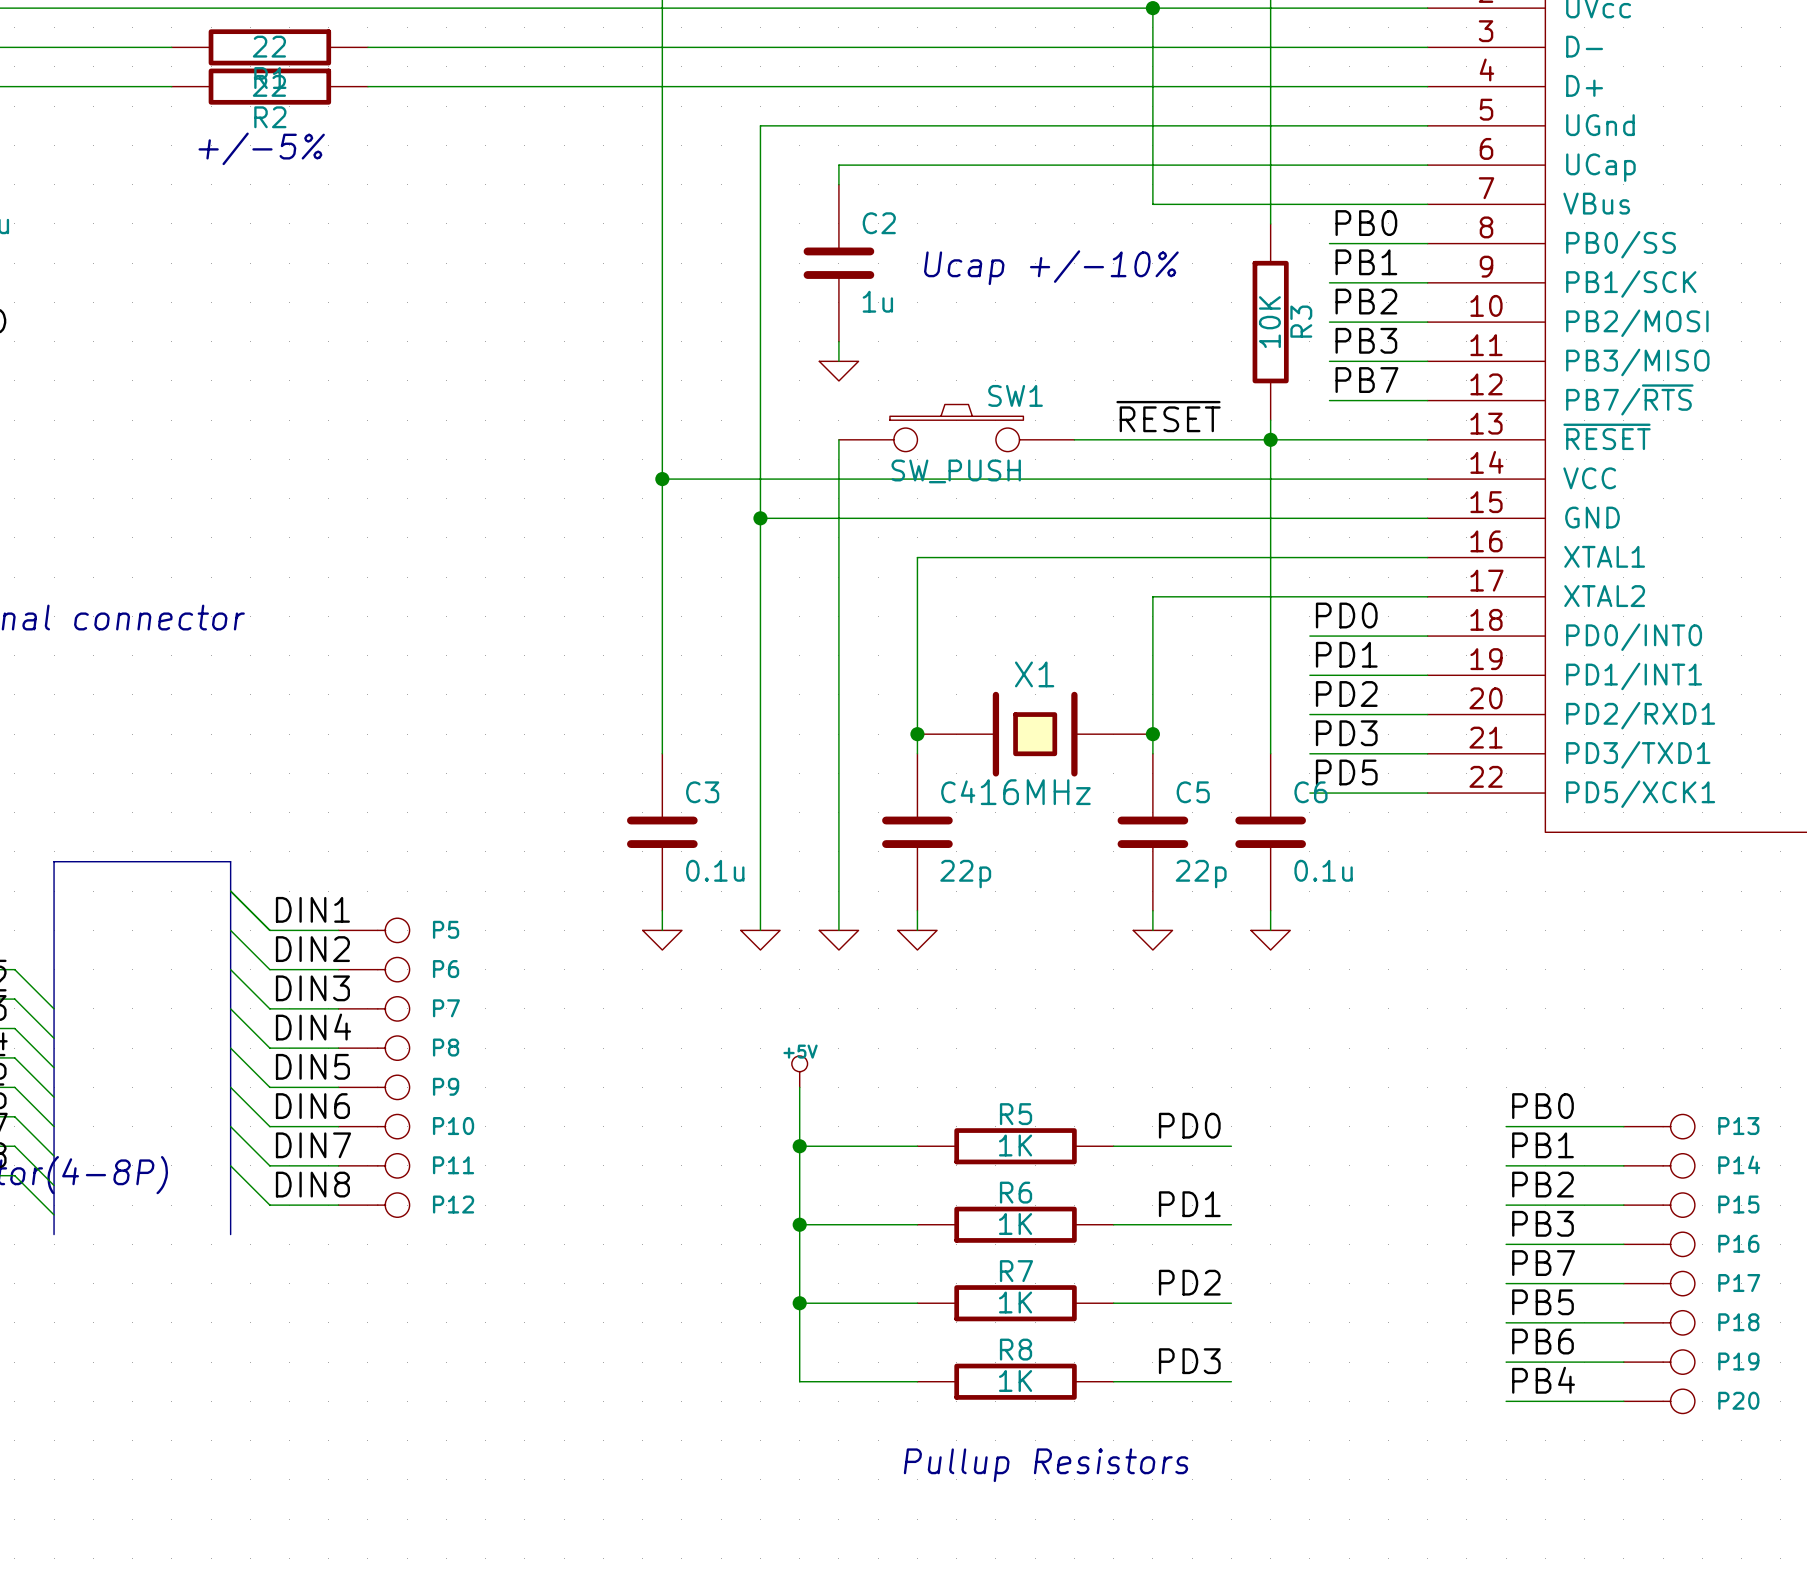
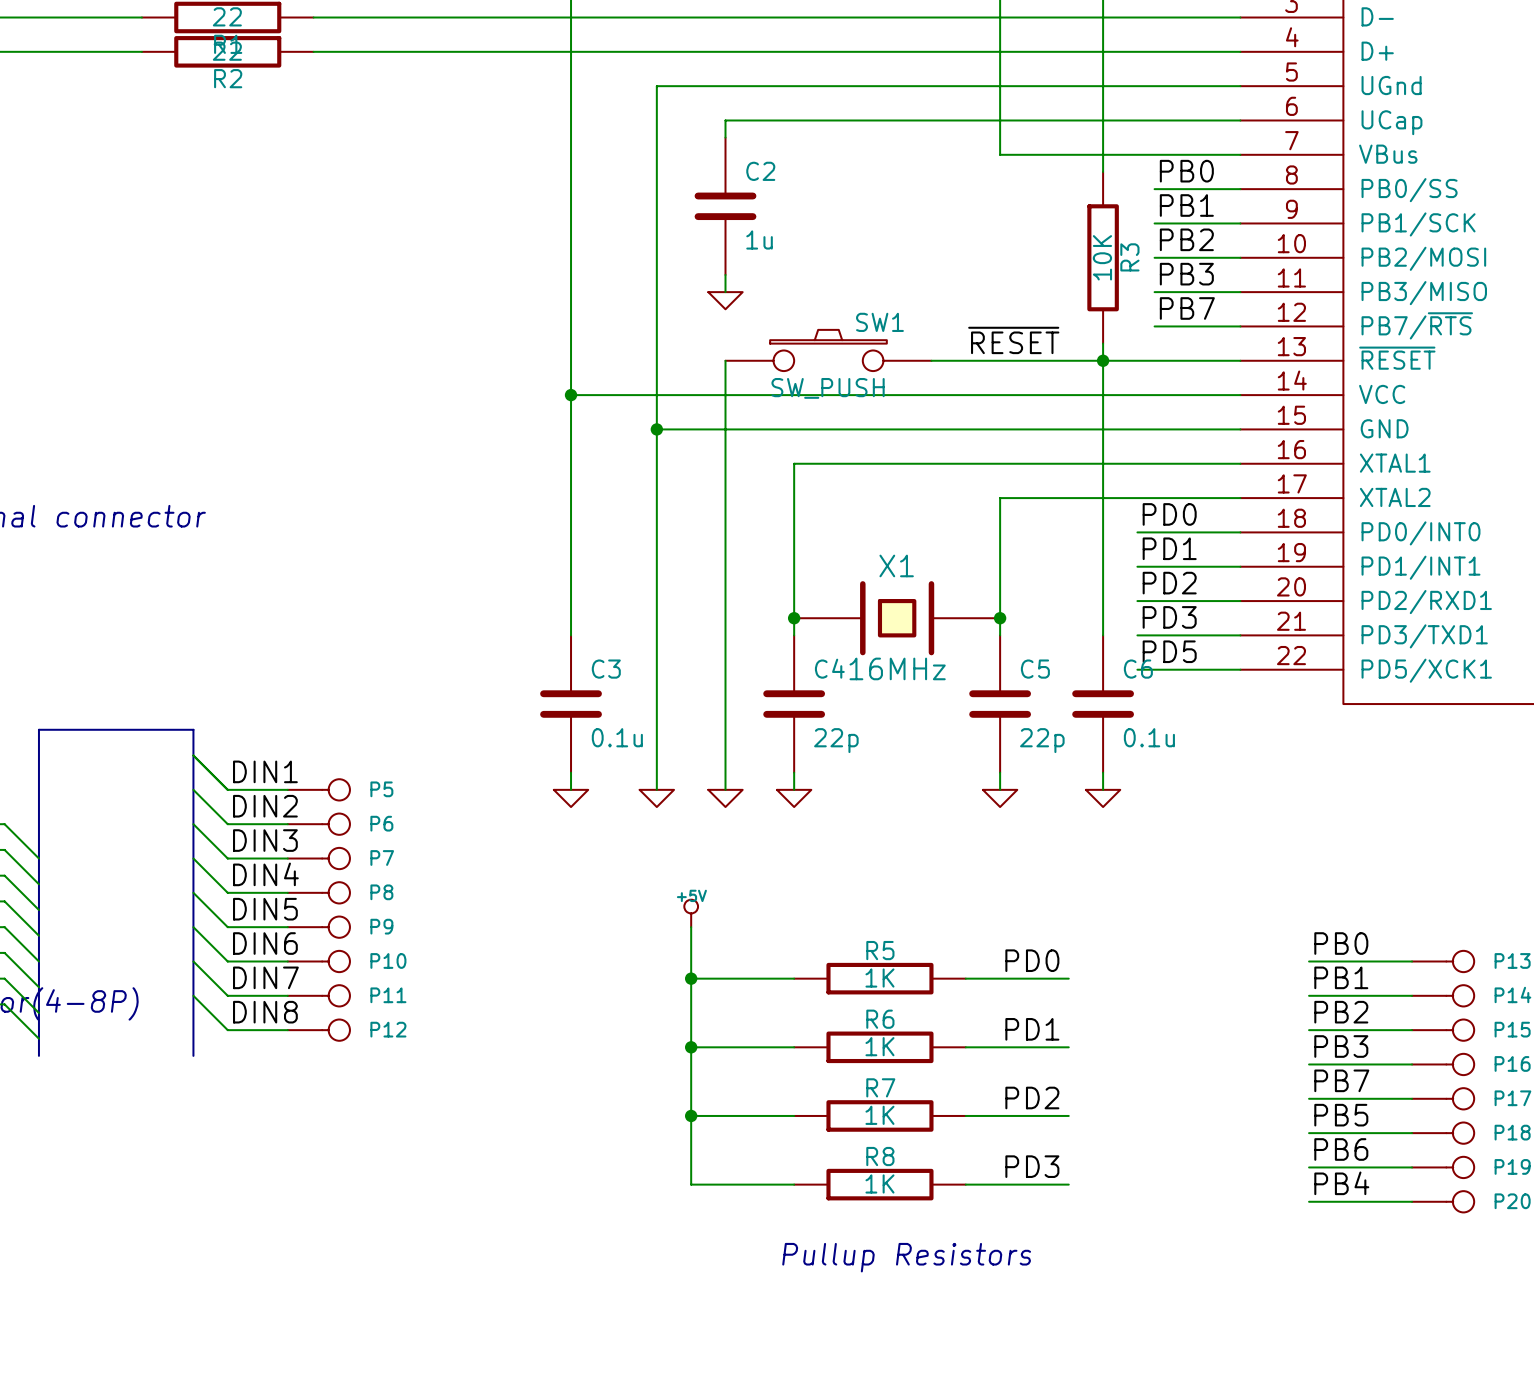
text: +/-5% (261, 148) -> none
text: Ucap +/-10% (1051, 267) -> none

